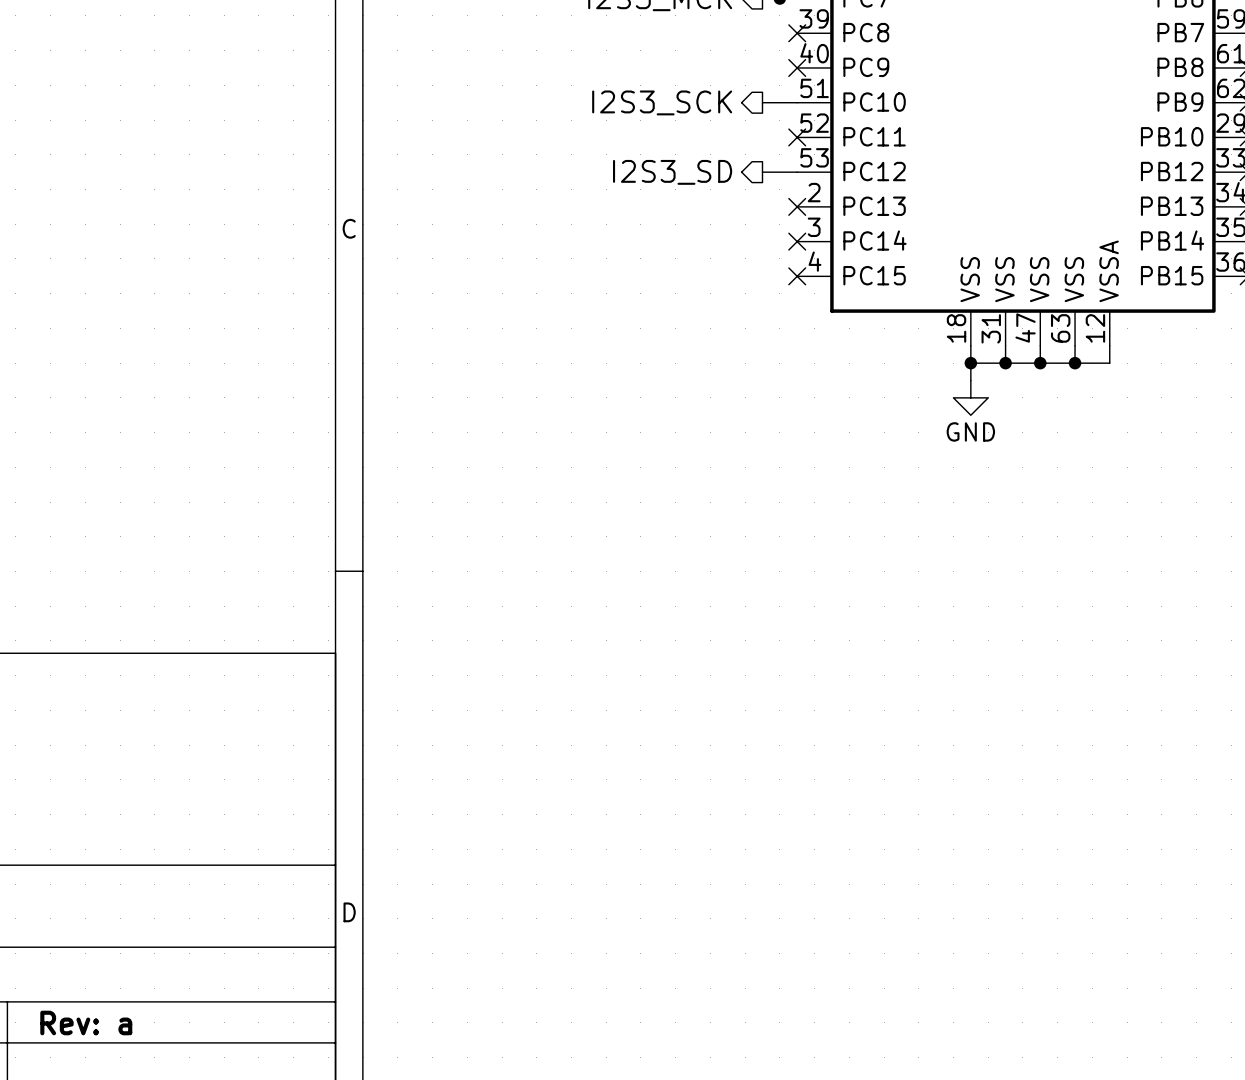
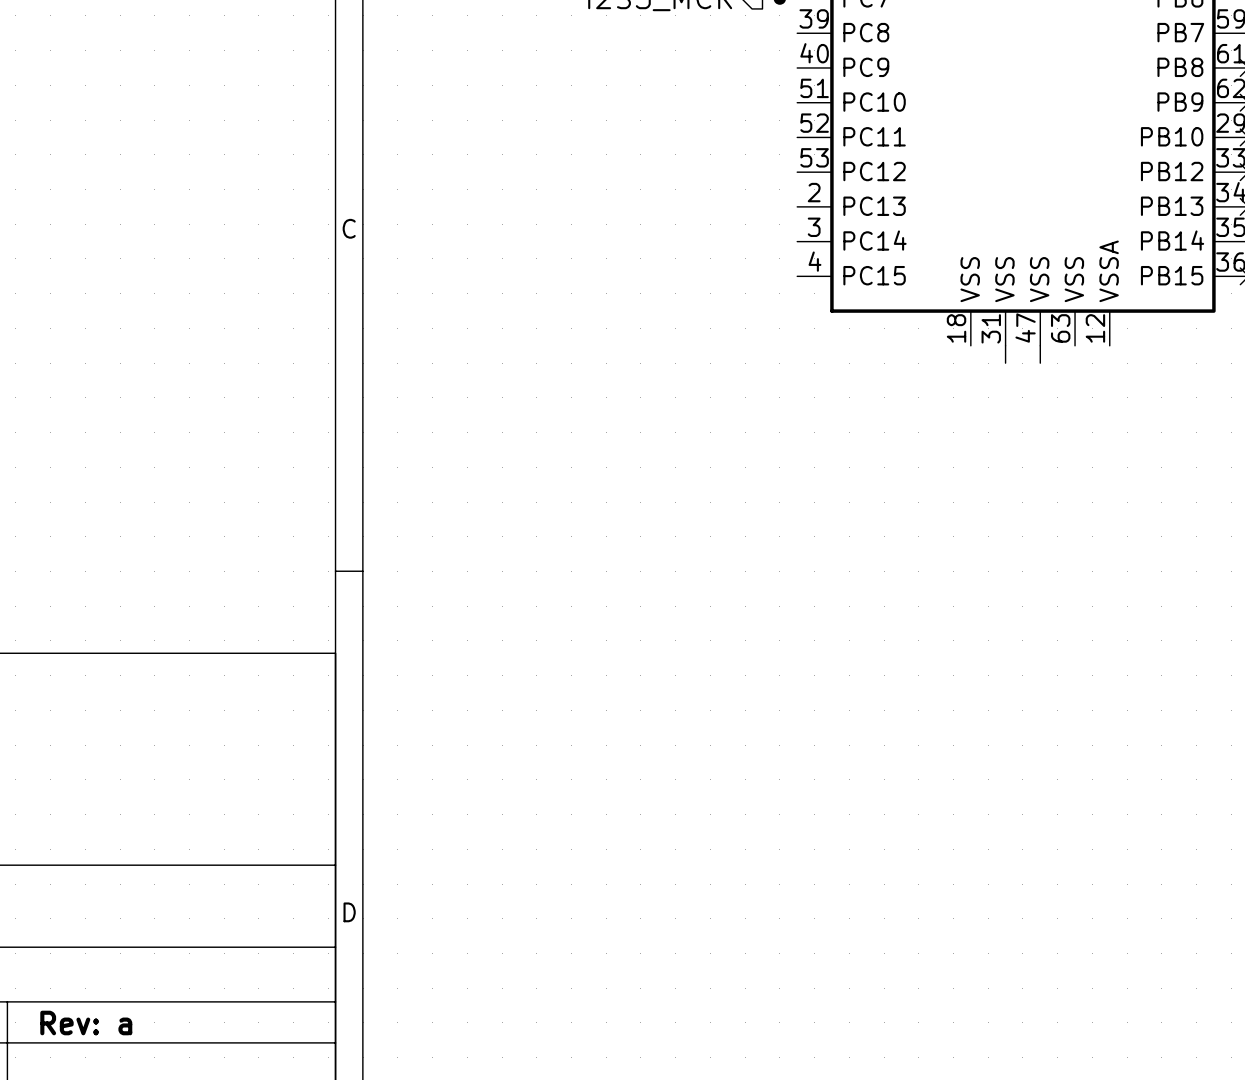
no-connect mark: (797, 33) -> none
no-connect mark: (797, 67) -> none
hierarchical label: I2S3_SCK (662, 102) -> none
wire: (762, 102) (797, 102) -> none
no-connect mark: (797, 137) -> none
hierarchical label: I2S3_SD (672, 172) -> none
wire: (762, 172) (797, 172) -> none
no-connect mark: (797, 206) -> none
no-connect mark: (797, 241) -> none
no-connect mark: (797, 276) -> none
wire: (970, 345) (970, 380) -> none
wire: (1075, 345) (1075, 363) -> none
wire: (1109, 345) (1109, 363) (970, 363) -> none
junction: (970, 363) -> none
junction: (1005, 363) -> none
junction: (1040, 363) -> none
junction: (1075, 363) -> none
power symbol: GND (970, 397) -> none

